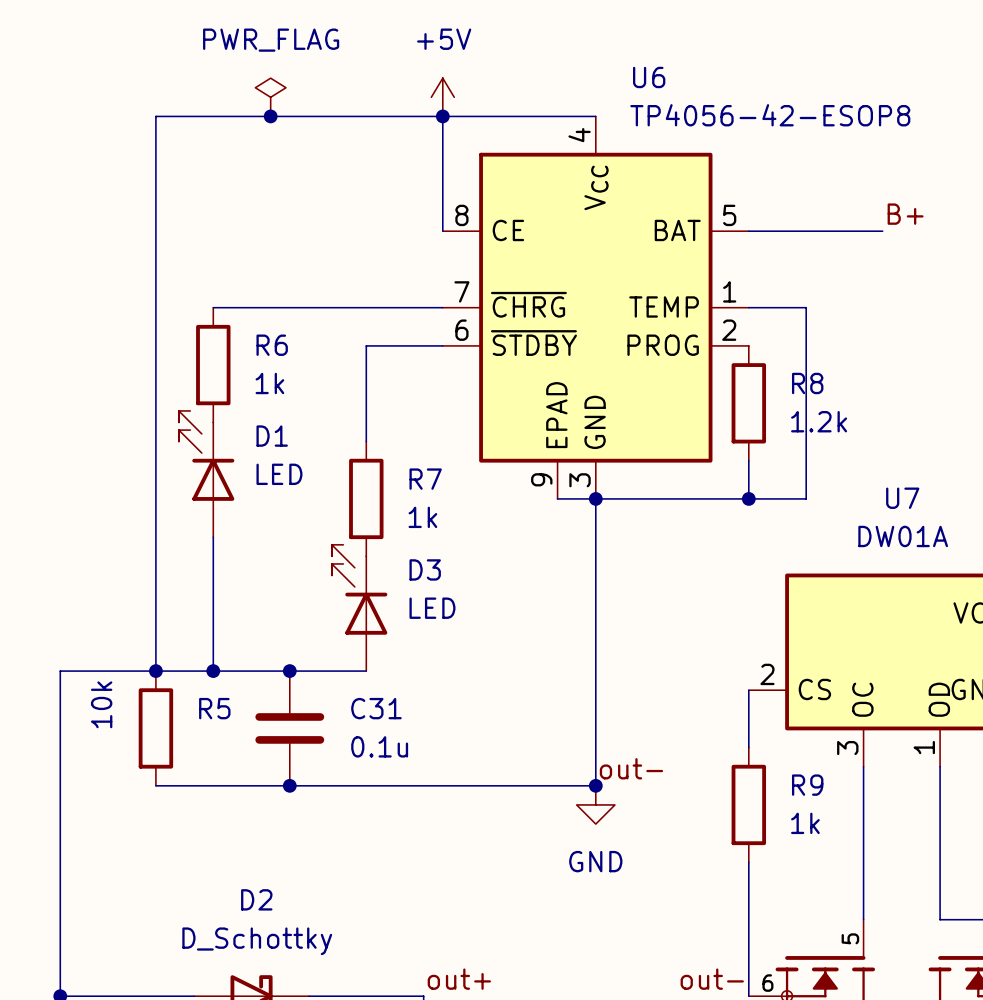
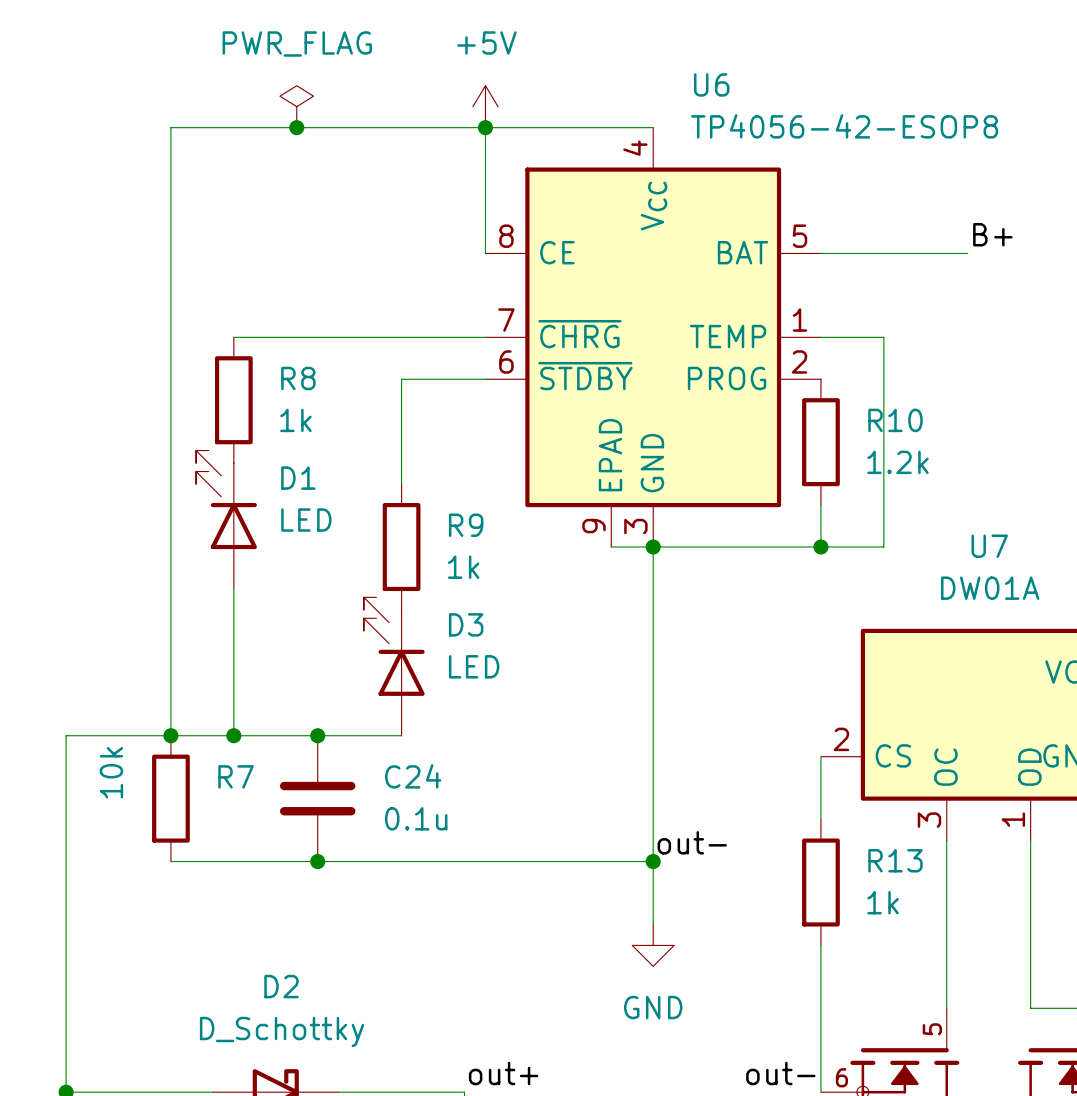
R6 name: R6 (272, 345) -> R8 (298, 378)
R8 name: R8 (807, 383) -> R10 (895, 420)
R7 name: R7 (425, 479) -> R9 (466, 525)
R5 name: R5 (214, 708) -> R7 (236, 776)
C31 name: C31 (376, 708) -> C24 (413, 776)
wire: none -> (653, 861) (653, 924)
R9 name: R9 (807, 785) -> R13 (895, 860)
power symbol position: GND (595, 804) -> GND (653, 945)

